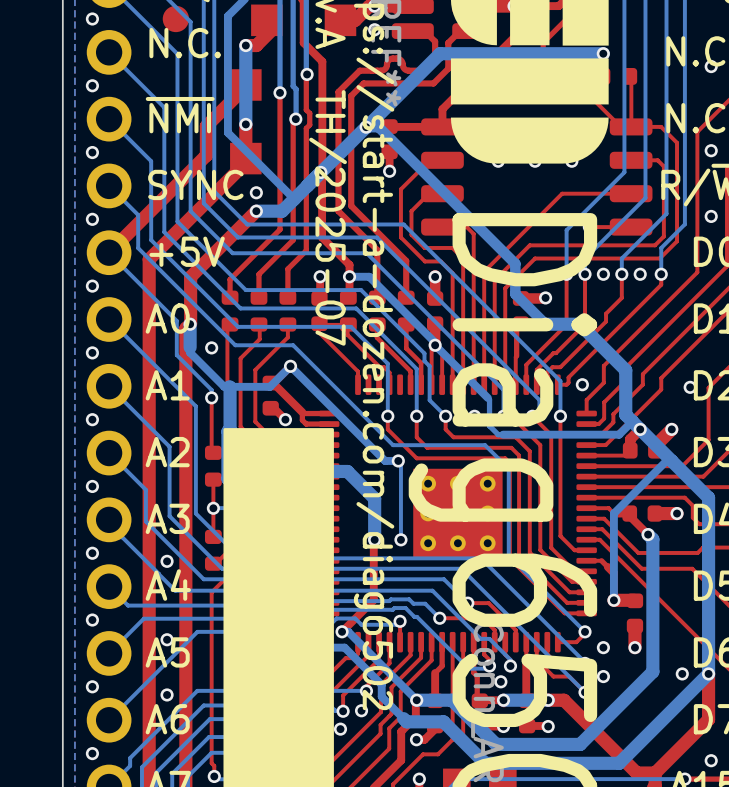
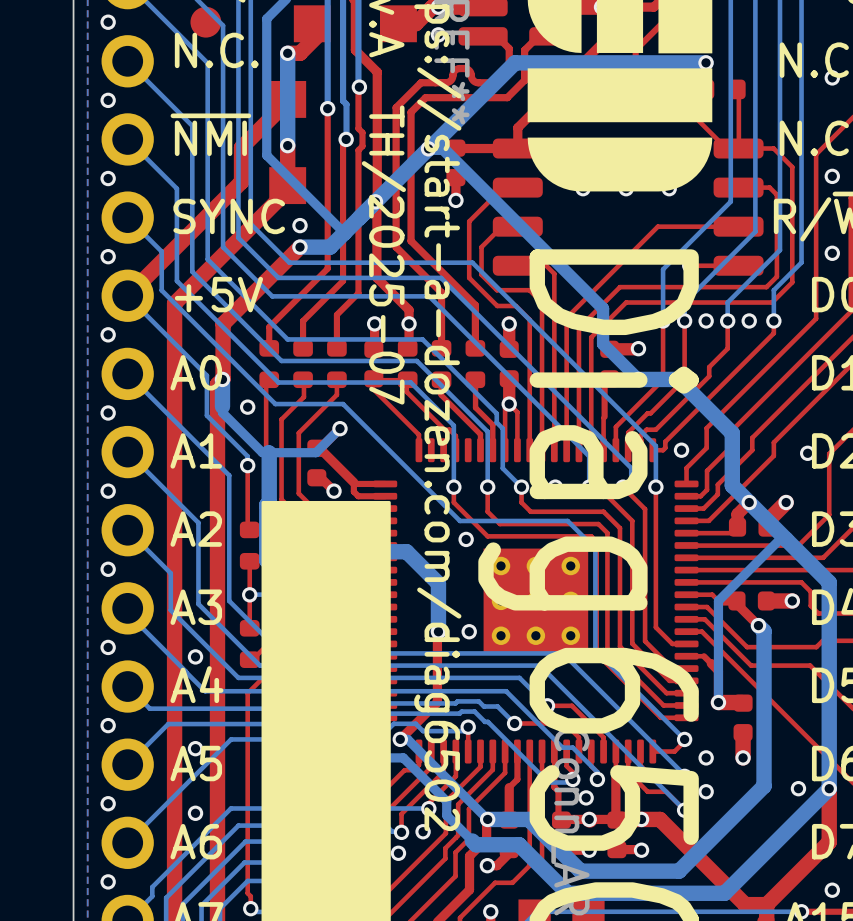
bottom track: (349, 276) (369, 276) (489, 399) (489, 425) (498, 434) (619, 434) (632, 421) -> none
bottom track: (290, 366) (385, 460) (398, 460) (400, 463) (400, 539) -> none
bottom track: (548, 700) (503, 700) -> none

